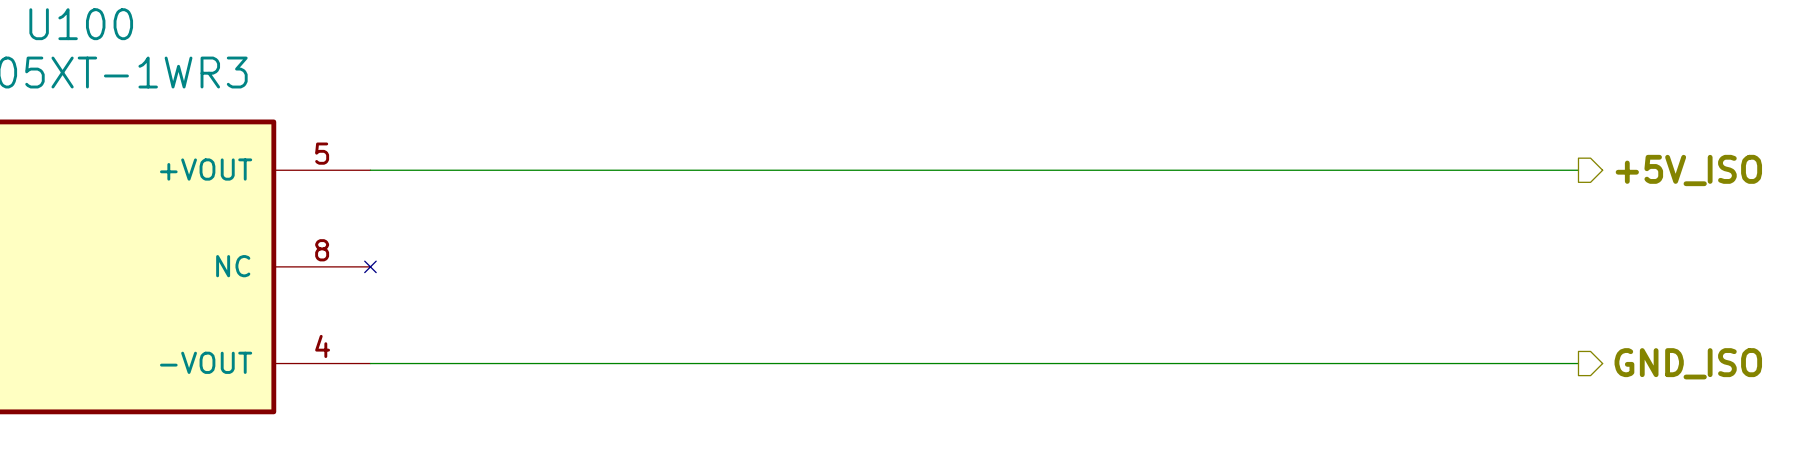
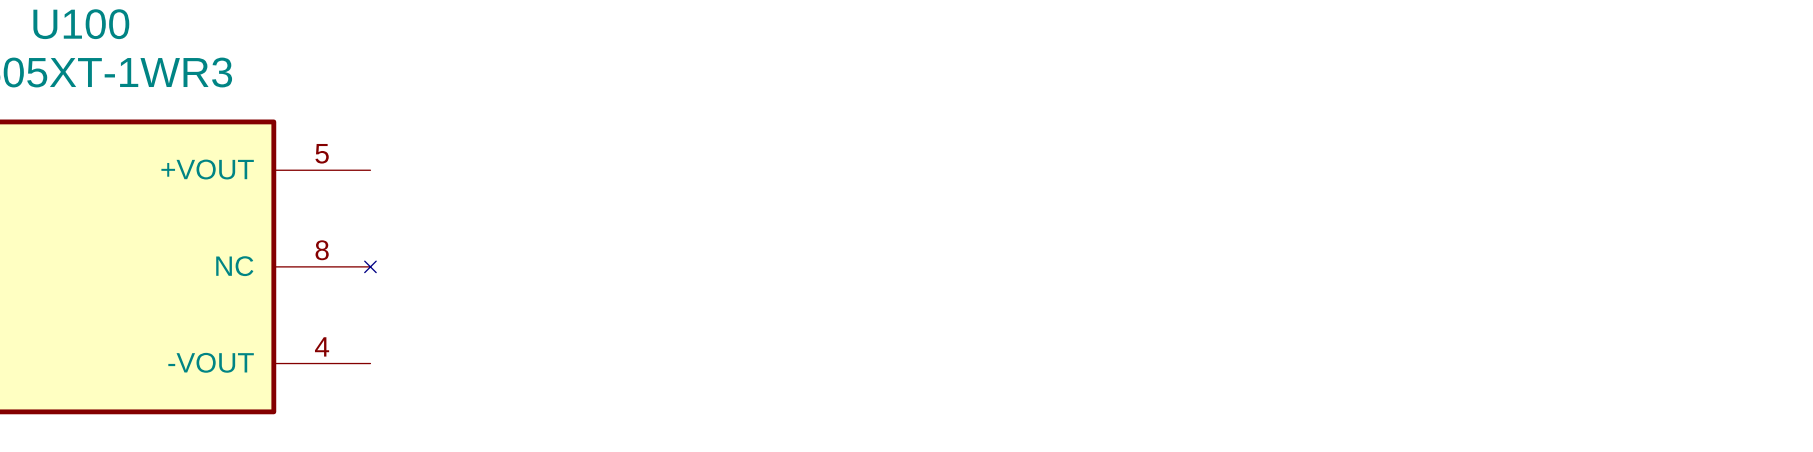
wire: (370, 170) (1578, 170) -> none
hierarchical label: +5V_ISO (1688, 170) -> none
wire: (370, 363) (1578, 363) -> none
hierarchical label: GND_ISO (1688, 363) -> none

